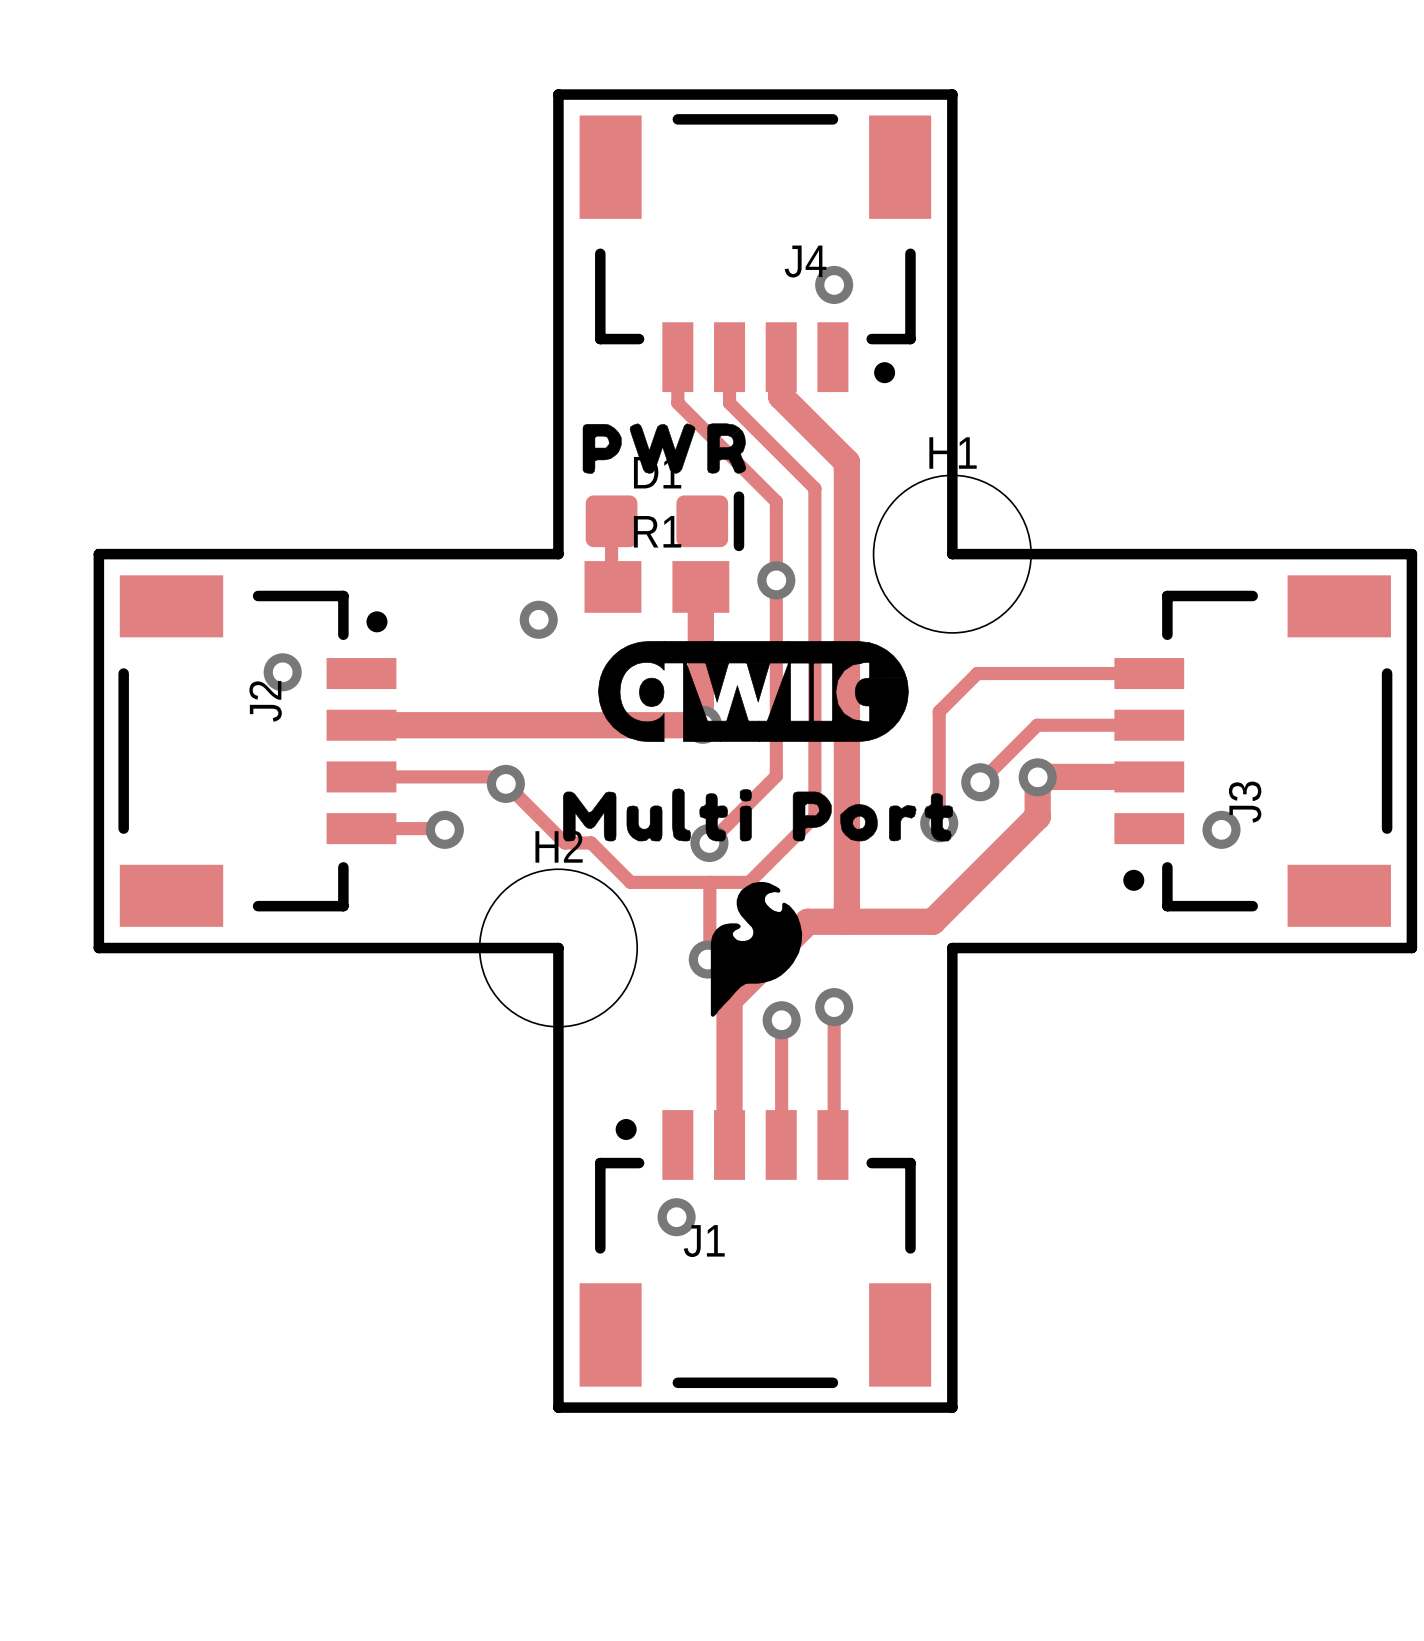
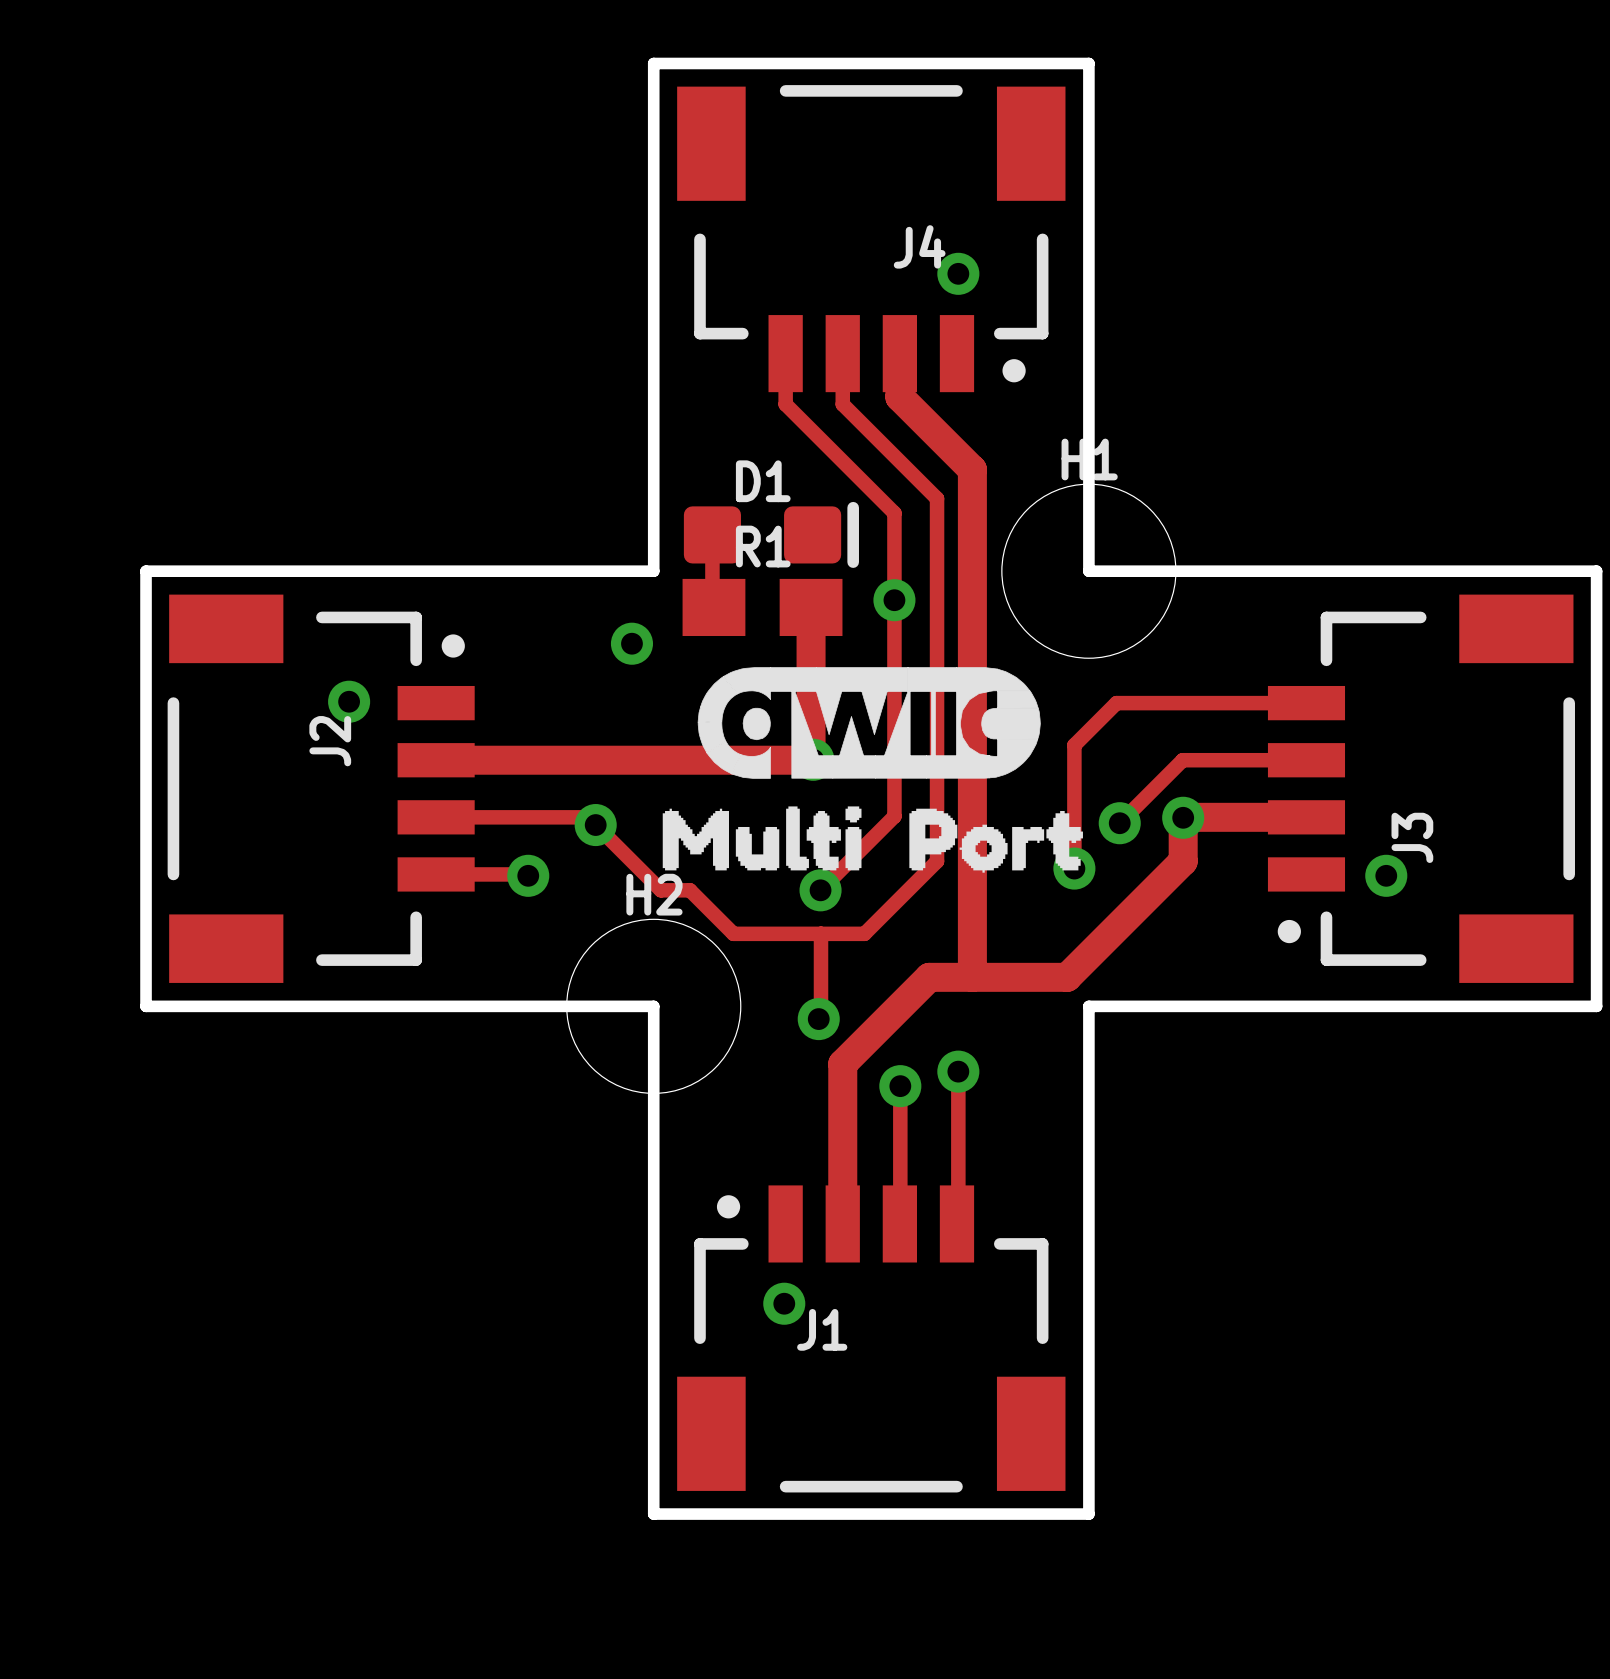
drawing: [582, 423, 747, 474] -> none
drawing shape: [563, 788, 752, 842] -> [662, 806, 862, 871]
drawing shape: [792, 791, 954, 842] -> [909, 808, 1083, 873]
drawing: [710, 882, 803, 1017] -> none

